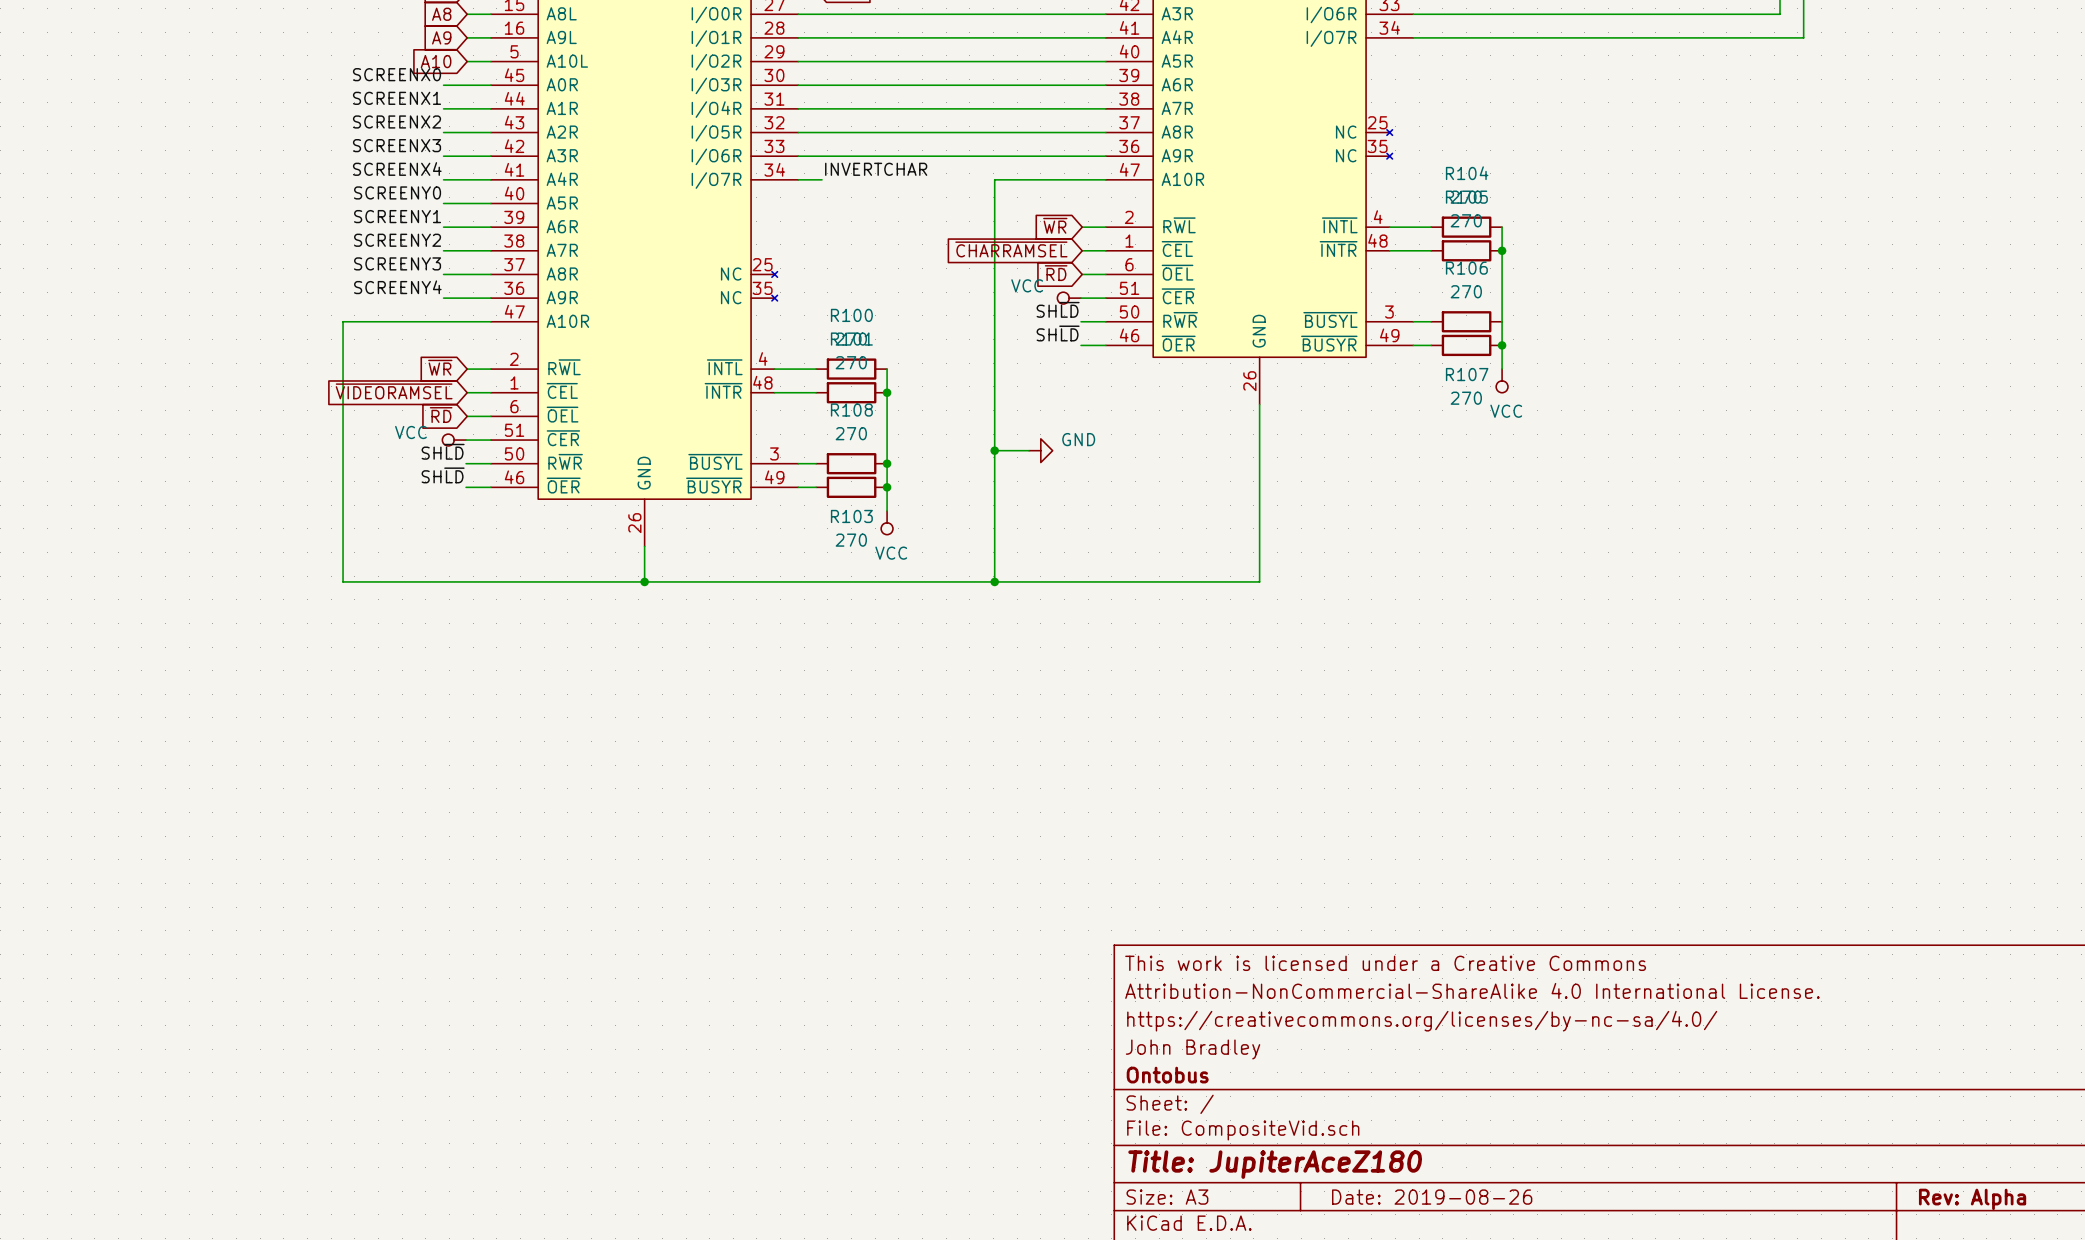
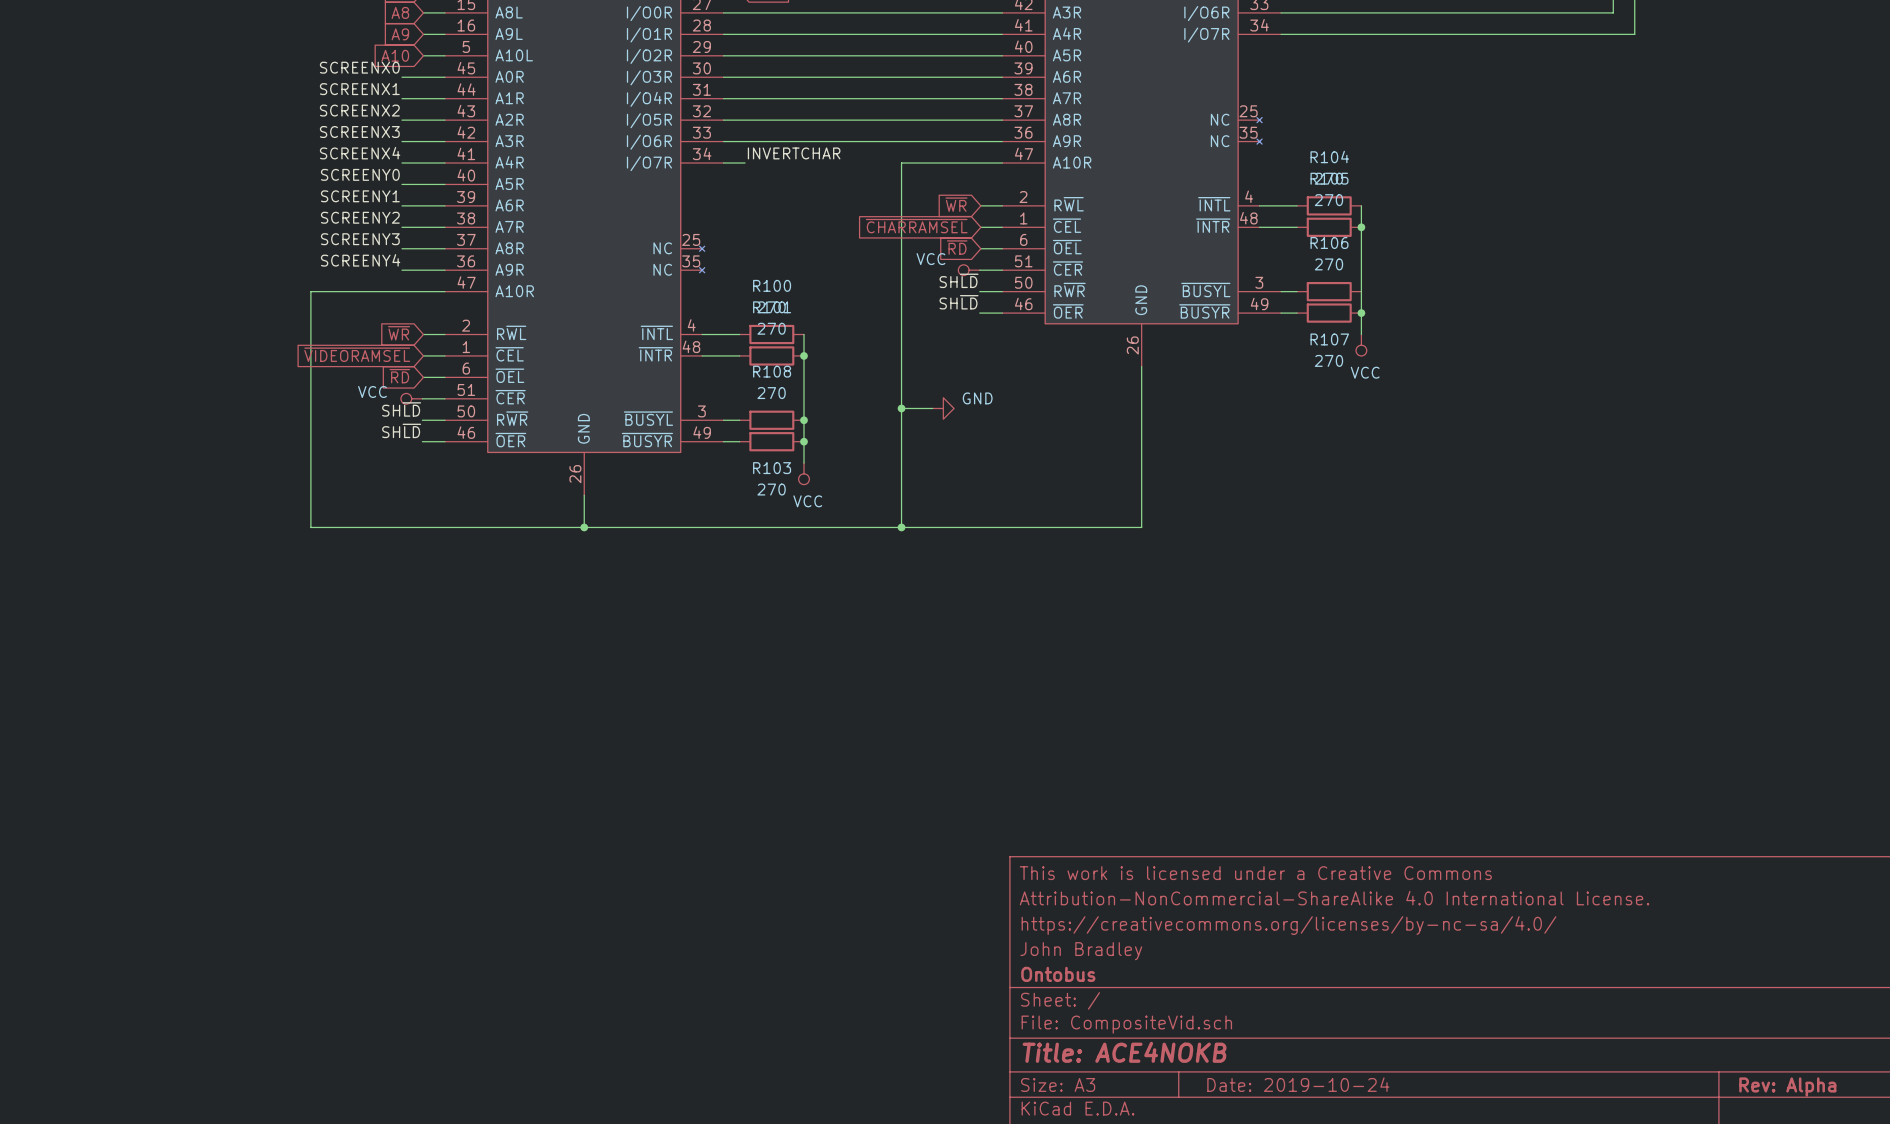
title block: Title: JupiterAceZ180 (1275, 1164) -> Title: ACE4NOKB (1124, 1052)
title block: Date: 2019-08-26 (1432, 1197) -> Date: 2019-10-24 (1298, 1084)

